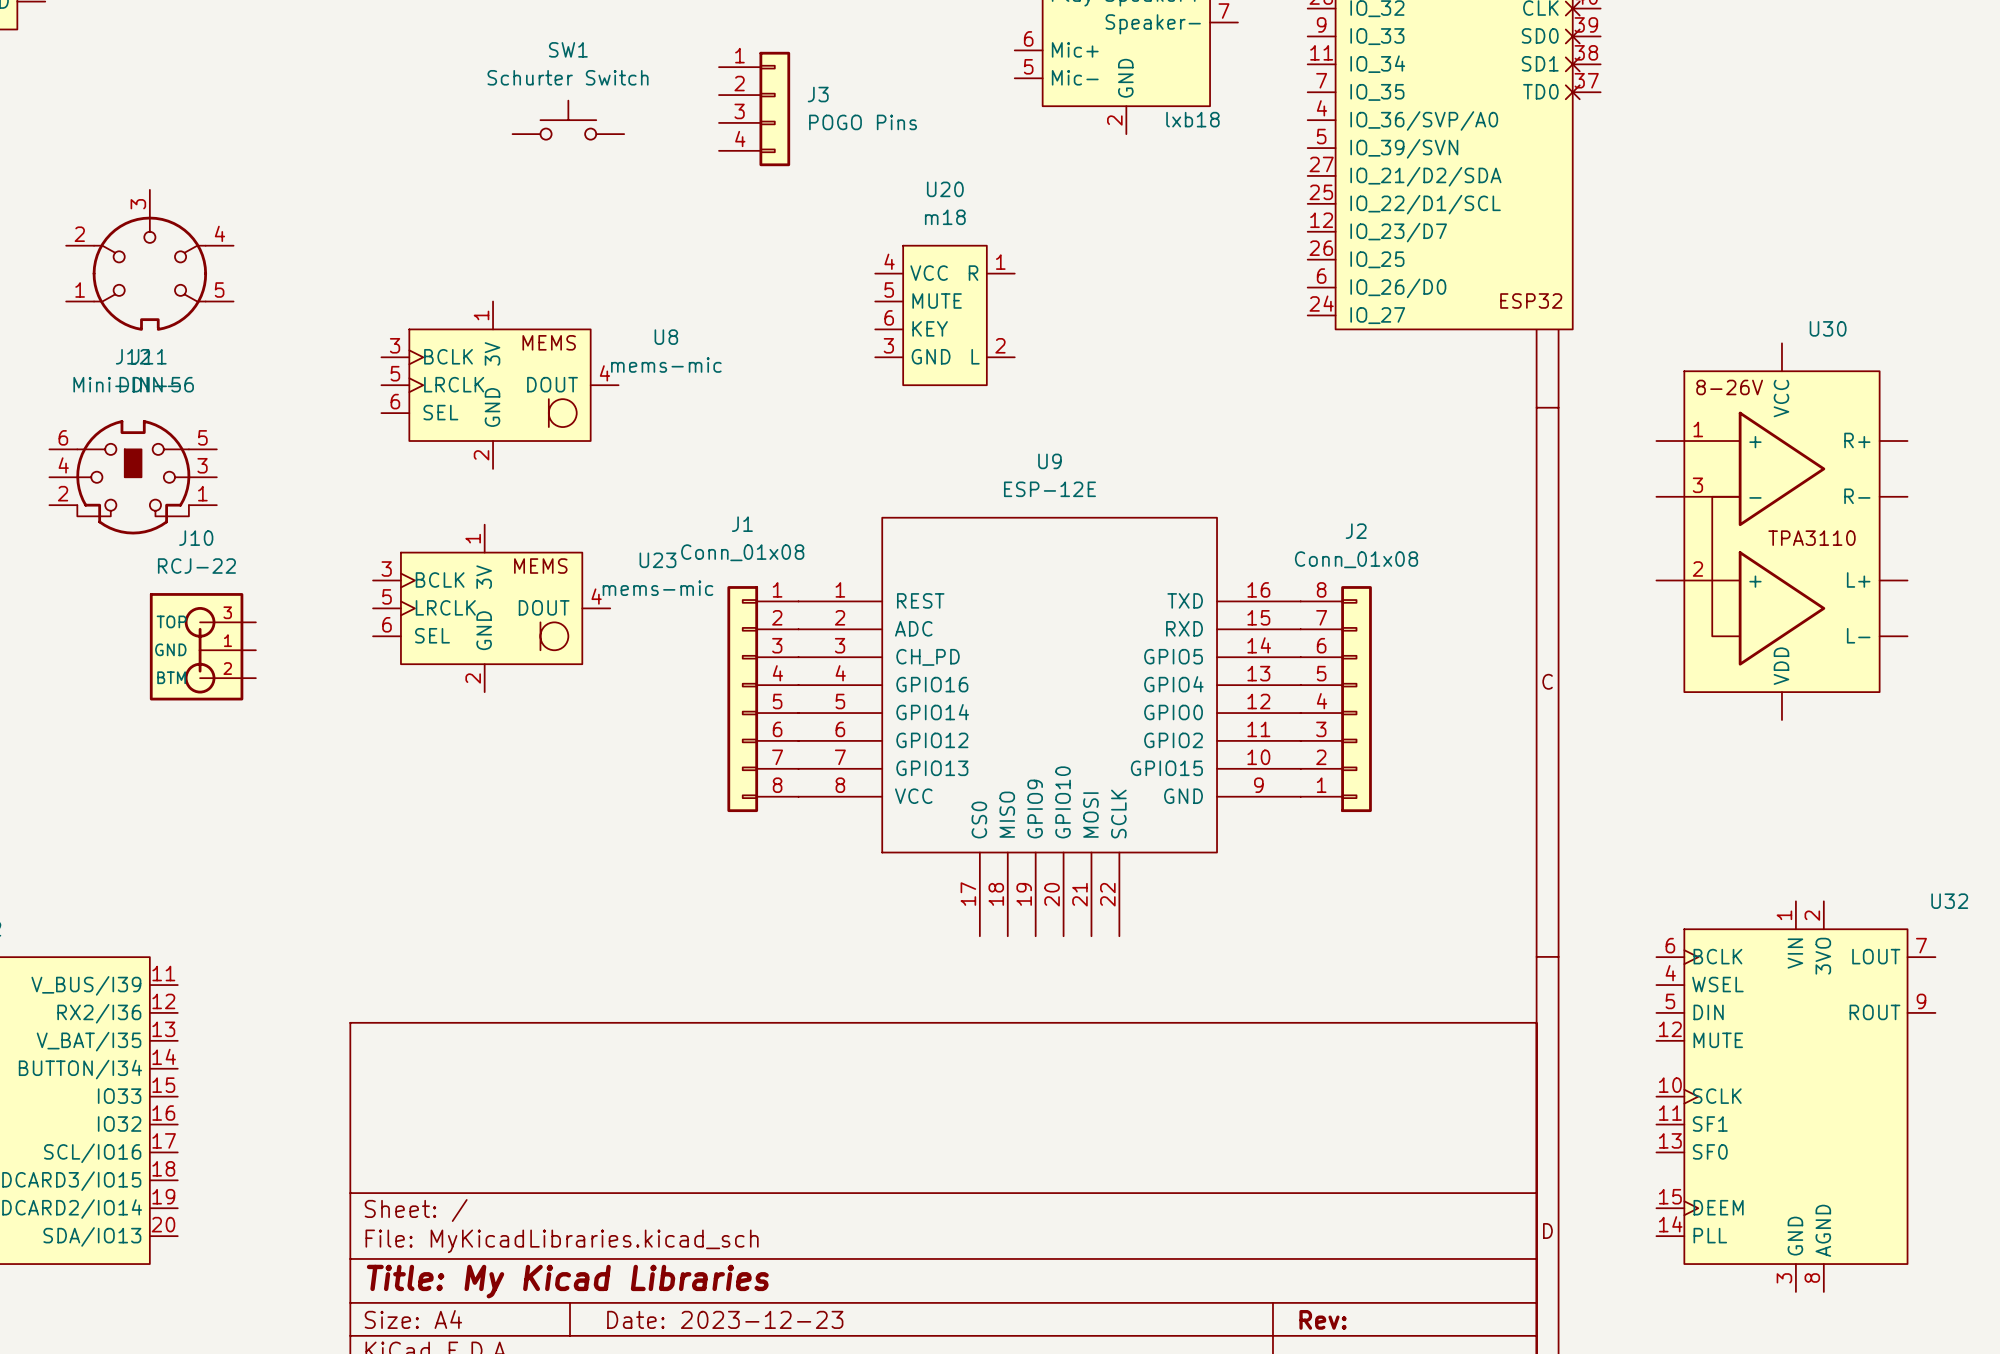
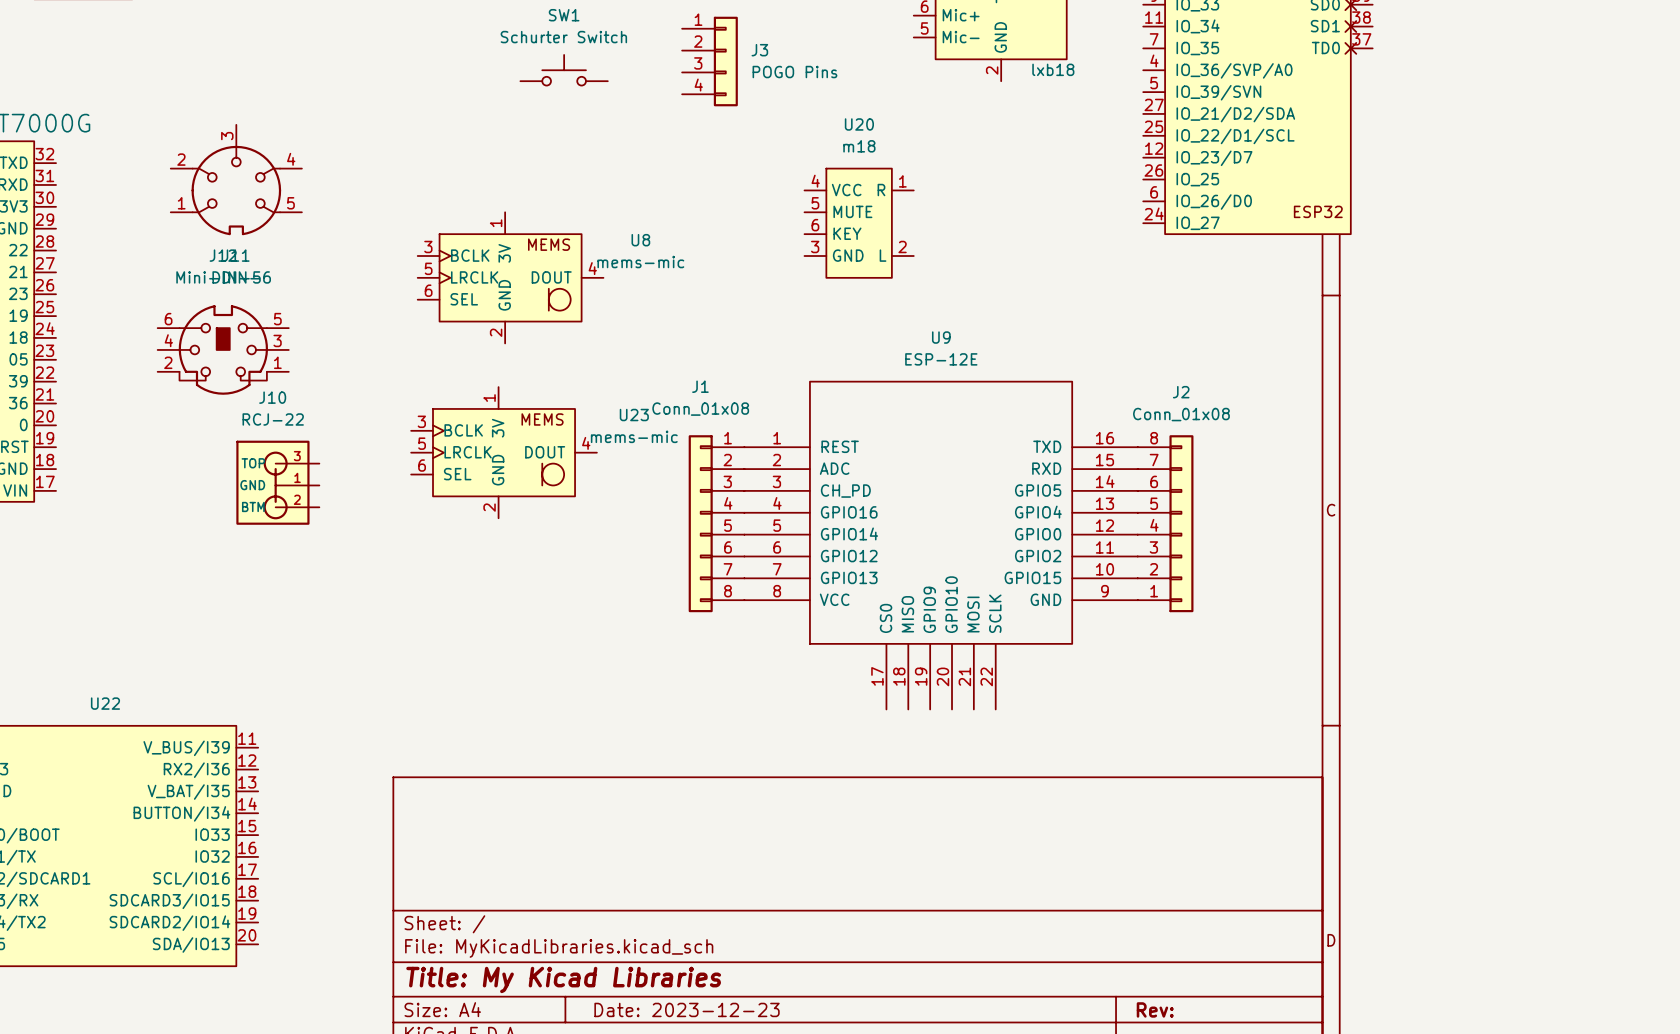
U30: (1781, 531) -> none
U32: (1795, 1096) -> none

